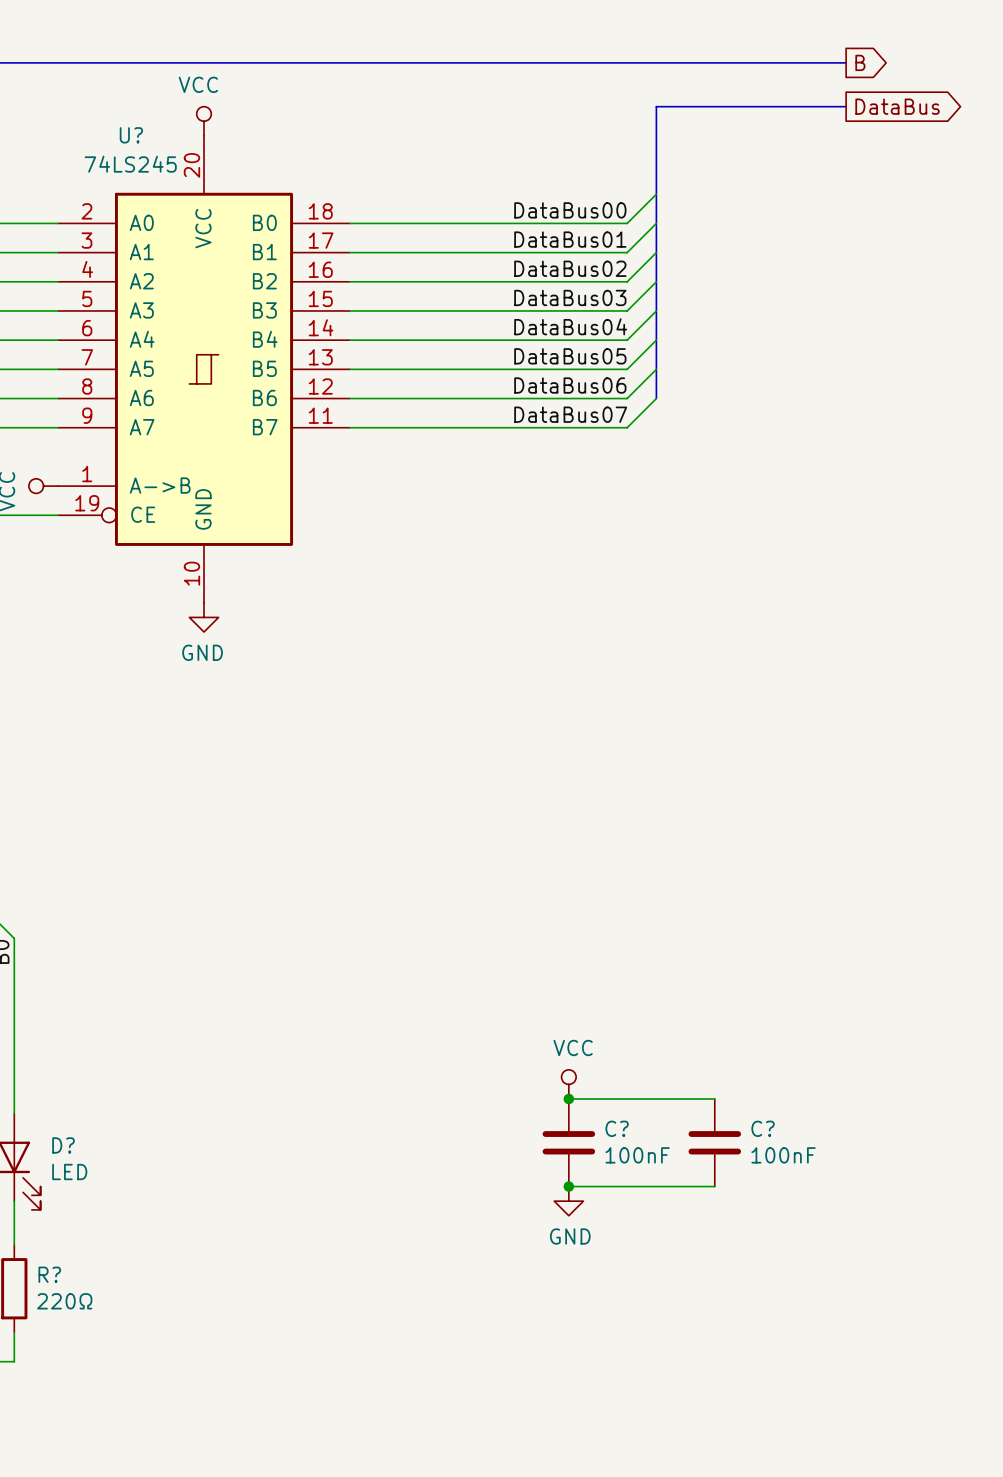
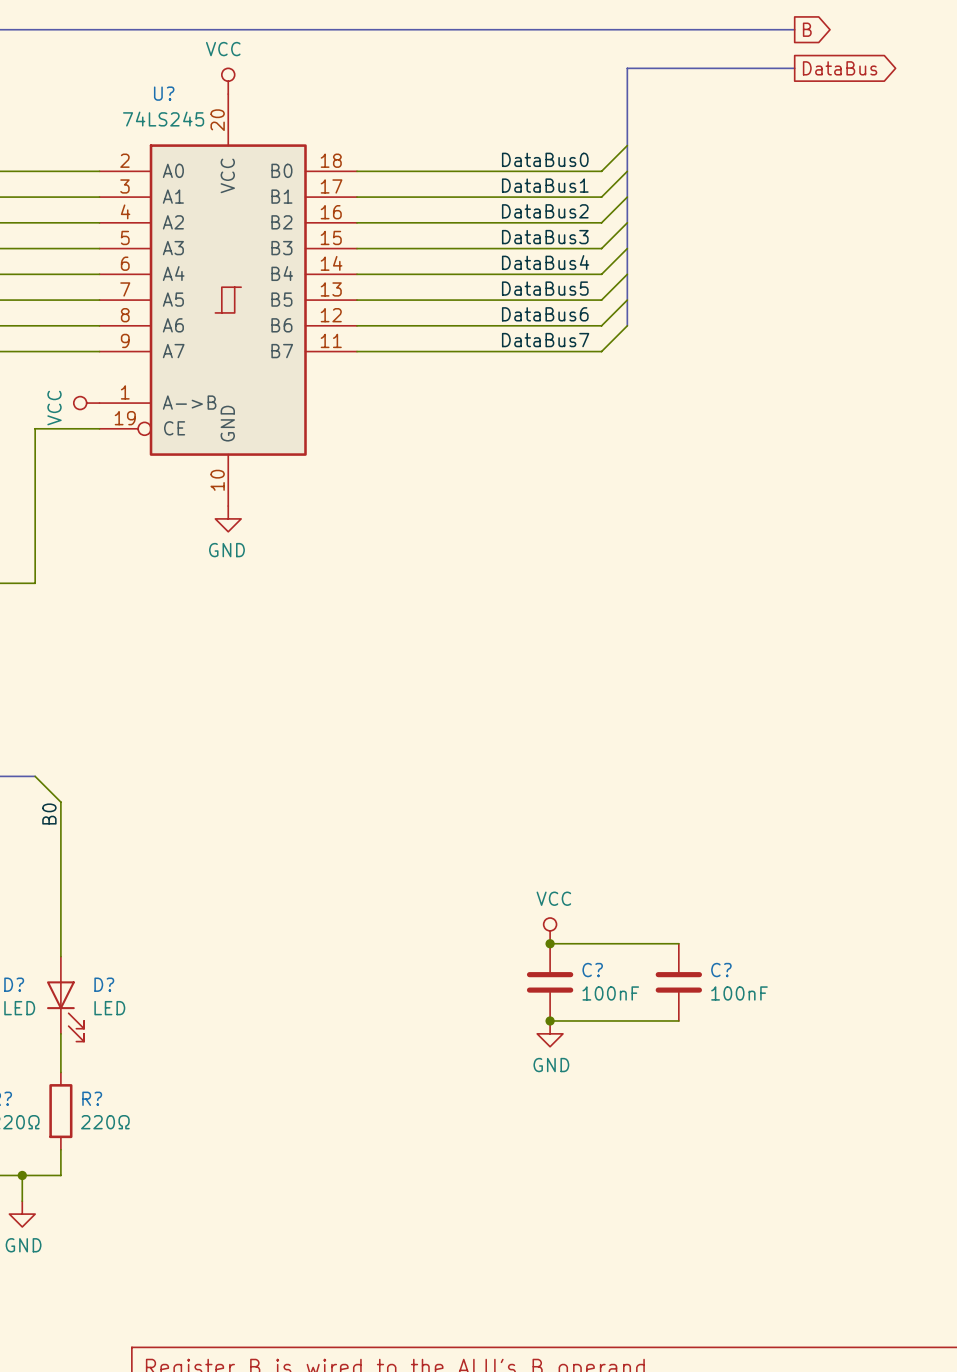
label: DataBus00 (570, 210) -> DataBus0 (545, 159)
label: DataBus01 (570, 239) -> DataBus1 (545, 185)
label: DataBus02 (570, 268) -> DataBus2 (545, 211)
label: DataBus03 (570, 297) -> DataBus3 (545, 237)
label: DataBus04 (570, 326) -> DataBus4 (545, 262)
label: DataBus05 (570, 356) -> DataBus5 (545, 288)
label: DataBus06 (570, 385) -> DataBus6 (545, 314)
label: DataBus07 (570, 414) -> DataBus7 (545, 340)

